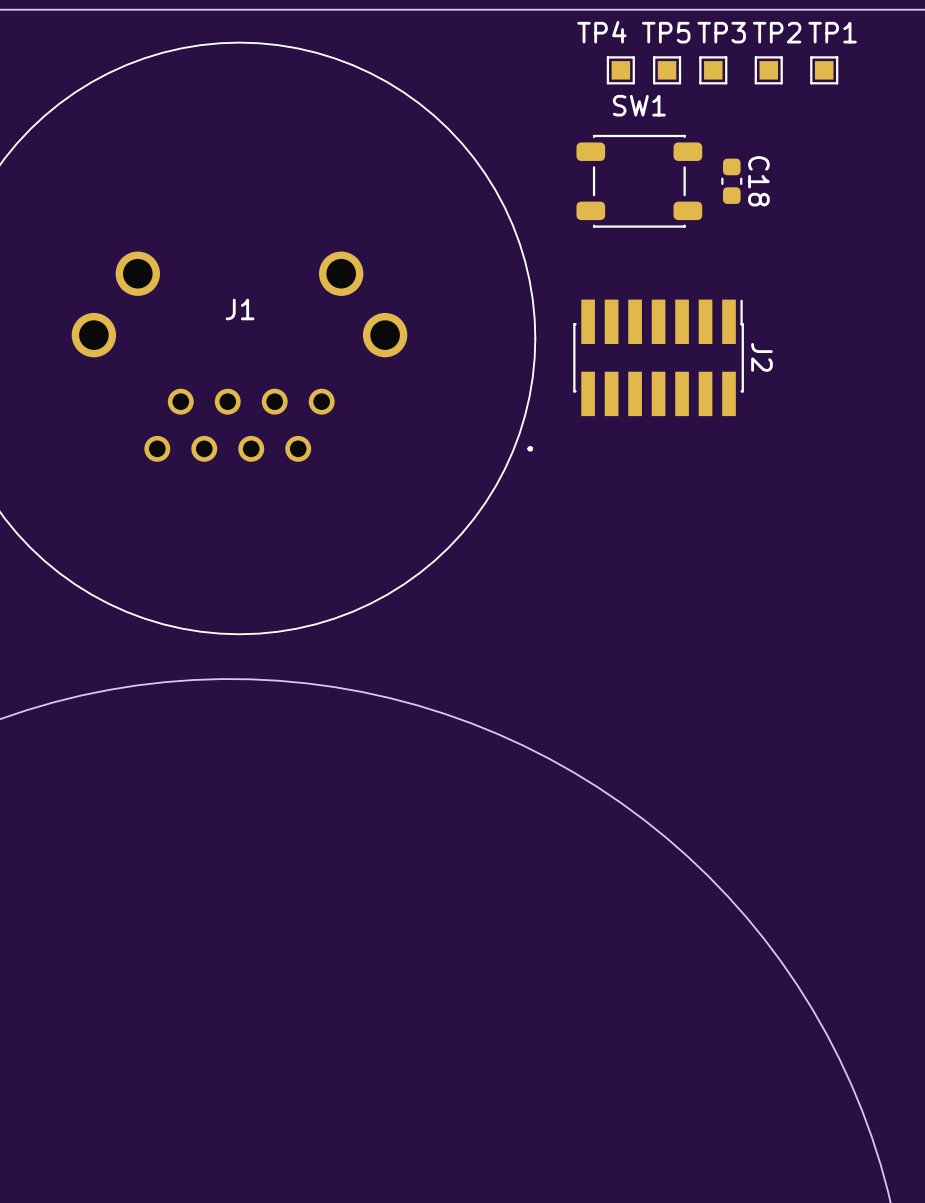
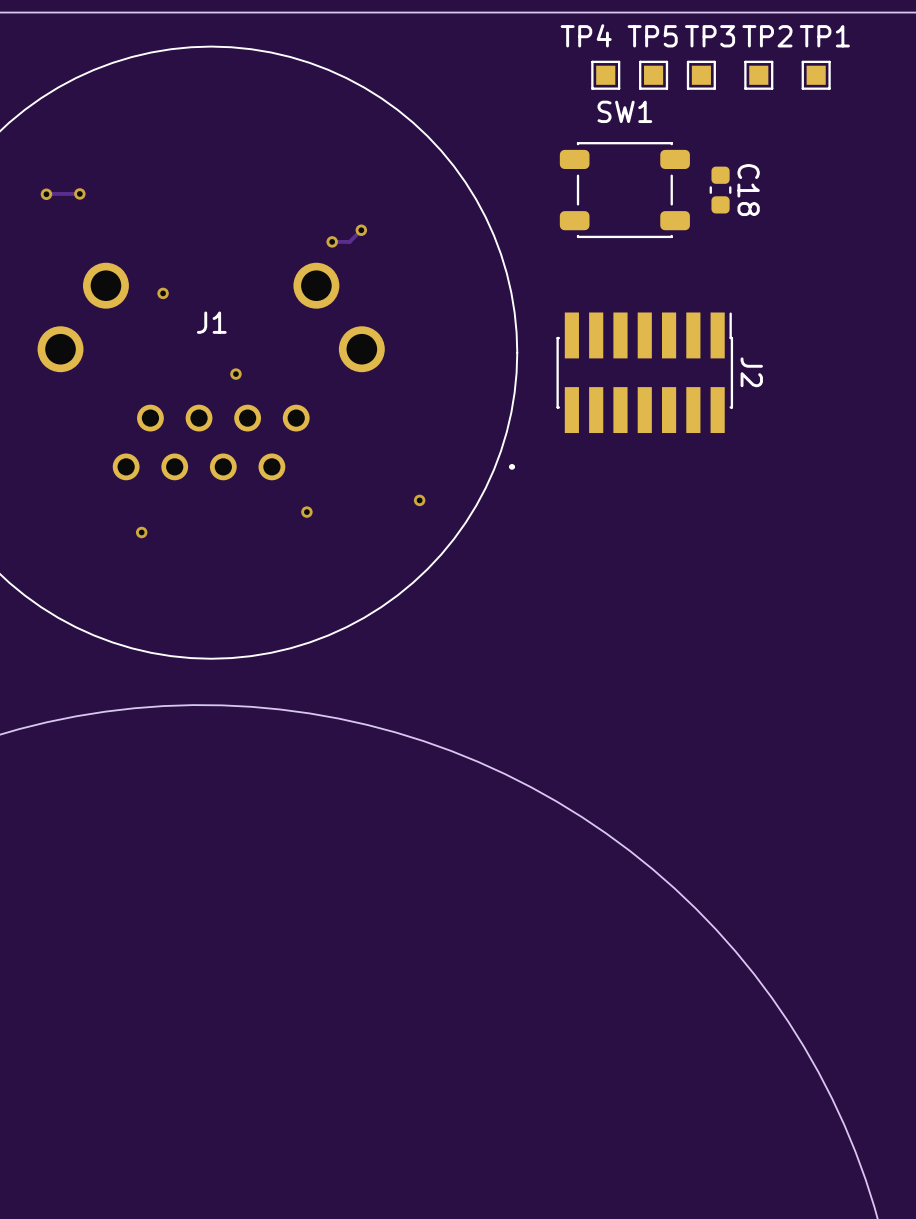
via: none -> (46, 194)
track: none -> (79, 193) (46, 194)
via: none -> (79, 193)
track: none -> (361, 230) (349, 241) (332, 241)
via: none -> (361, 230)
via: none -> (332, 241)
via: none -> (163, 293)
via: none -> (235, 374)
via: none -> (419, 500)
via: none -> (306, 512)
via: none -> (141, 532)

